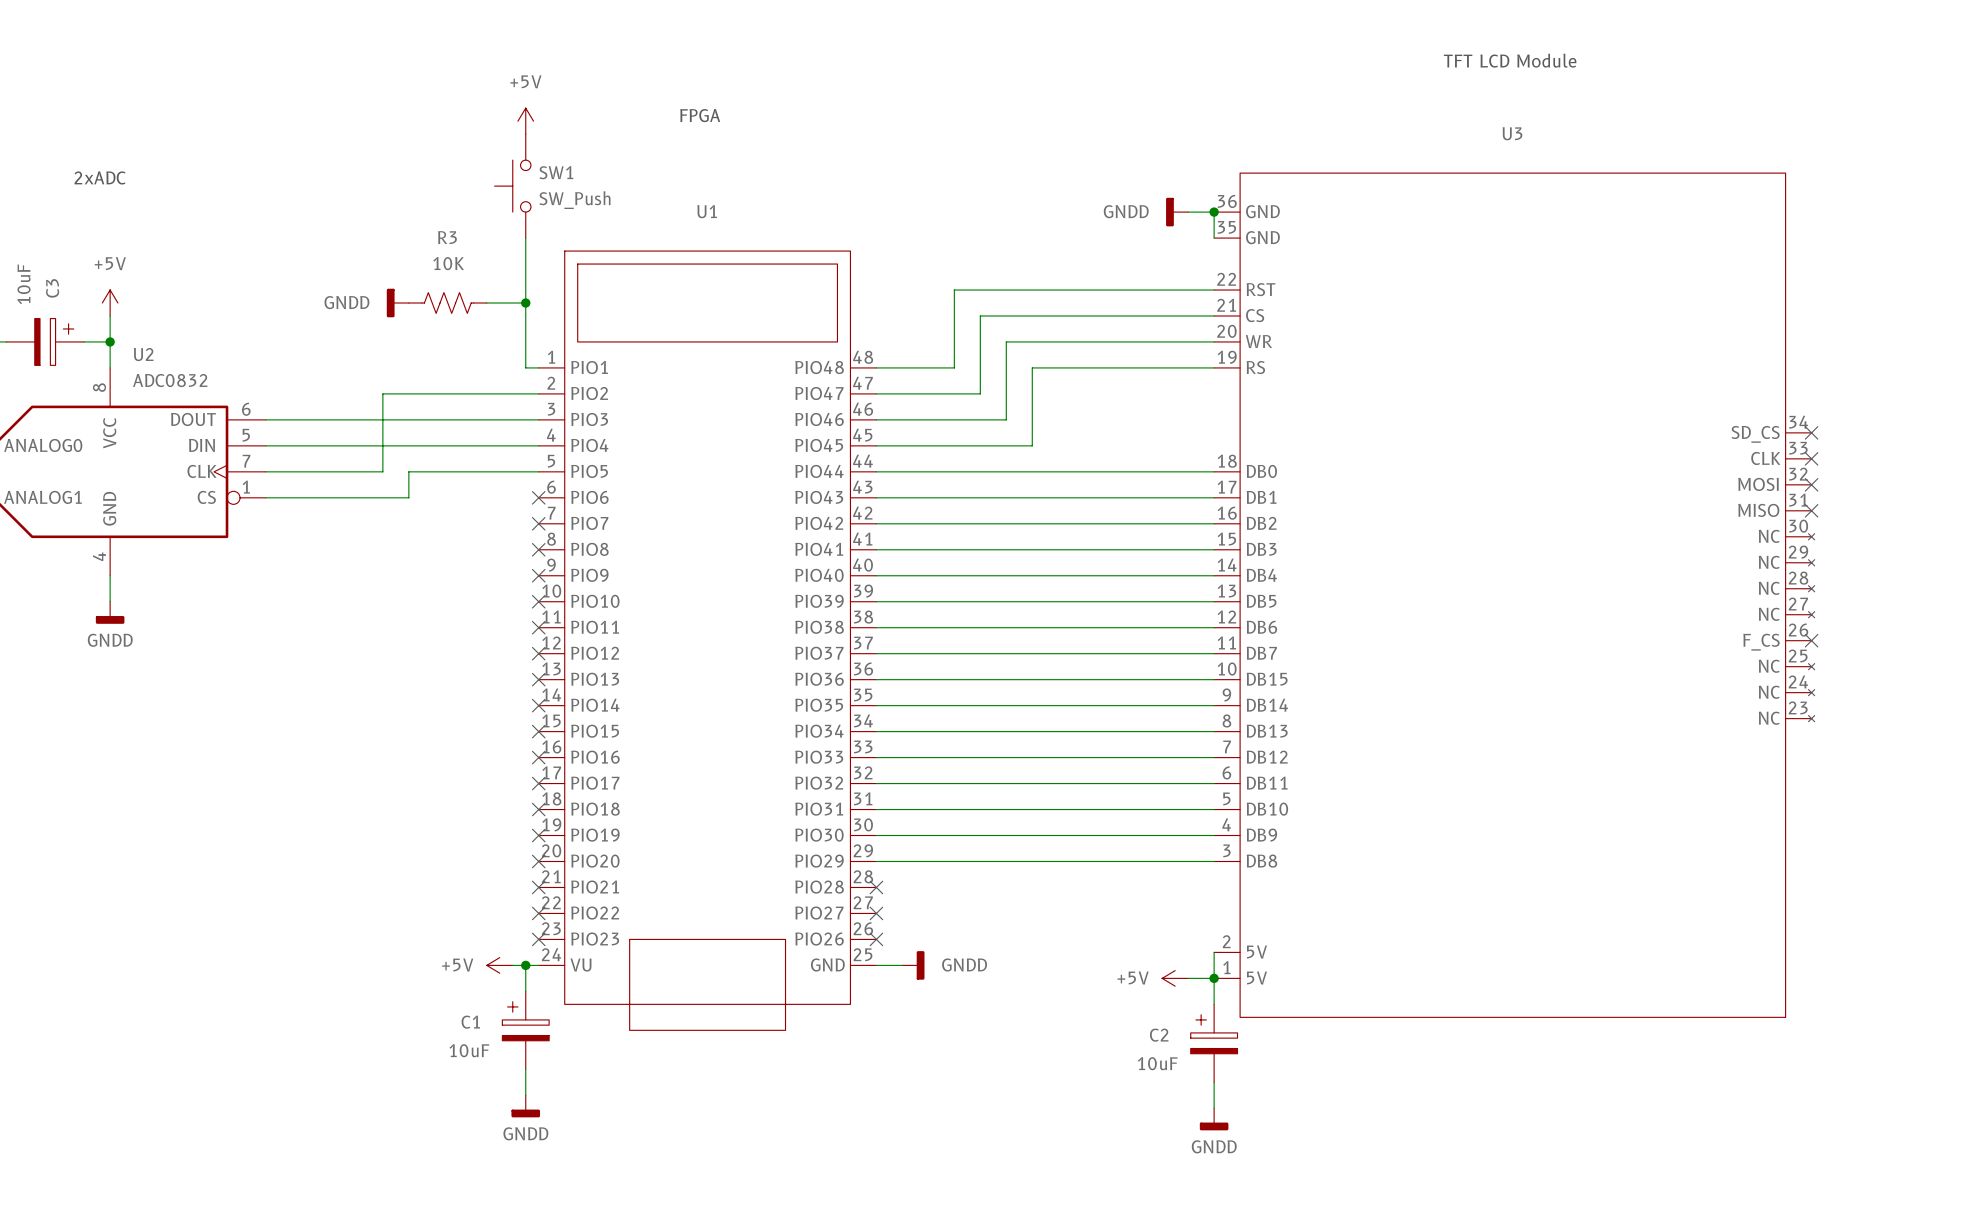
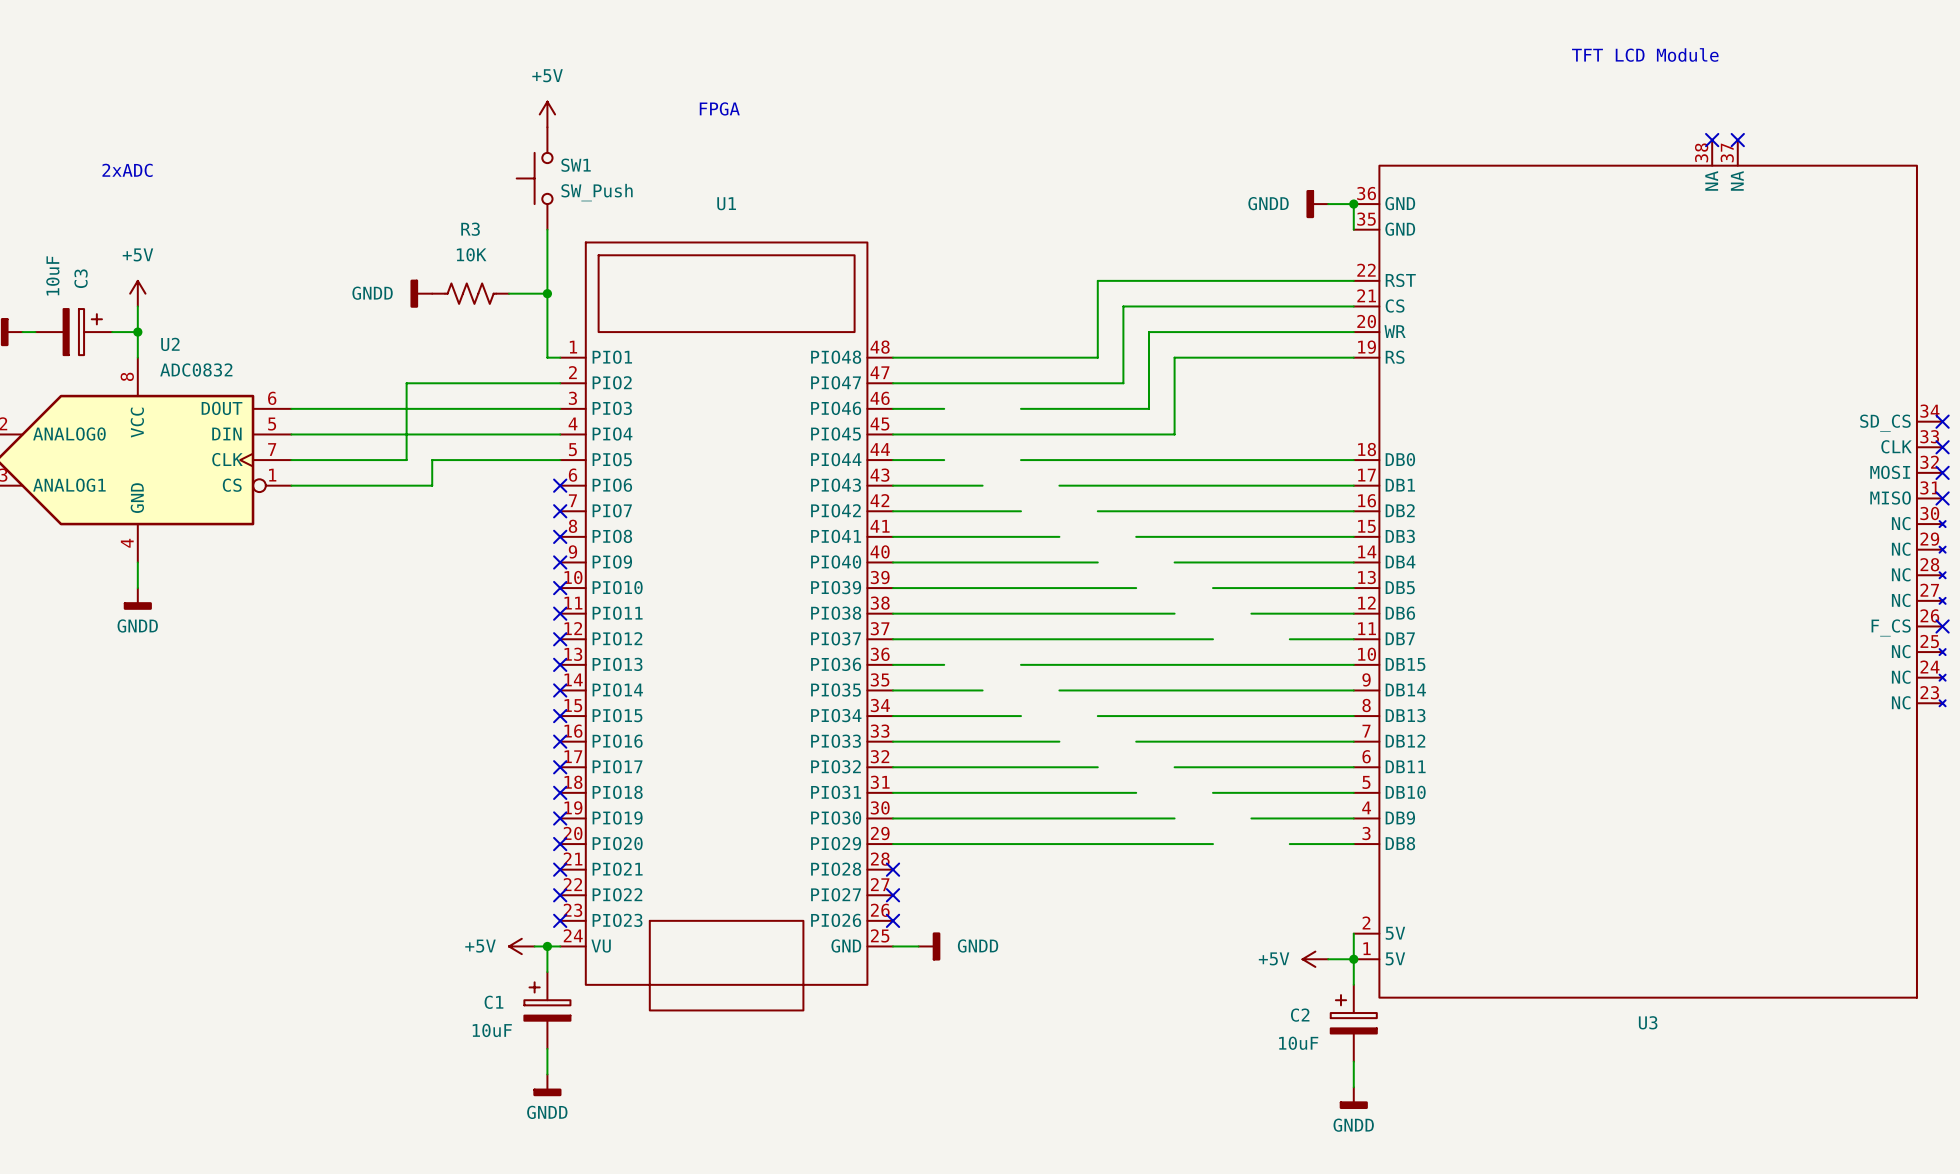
text position: TFT LCD Module (1510, 60) -> TFT LCD Module (1645, 54)
U3 name position: U3 (1512, 133) -> U3 (1648, 1022)
no-connect mark: none -> (1712, 140)
no-connect mark: none -> (1737, 140)
U3 symbol: [1214, 173, 1815, 1018] -> [1353, 140, 1946, 998]
power symbol position: GNDD (1177, 212) -> GNDD (1317, 204)
wire: (1188, 212) (1214, 212) (1214, 238) -> (1328, 204) (1353, 204) (1353, 229)
junction: (1214, 212) -> none
junction: none -> (1353, 204)
wire: (1084, 290) (954, 290) (954, 367) -> (1046, 357) (969, 357)
wire: none -> (1225, 280) (1353, 280)
wire: (1110, 315) (980, 315) (980, 393) -> (1123, 306) (1123, 383) (995, 383)
wire: none -> (1225, 306) (1353, 306)
wire: (1136, 341) (1006, 341) (1006, 419) (928, 419) -> (1148, 332) (1148, 408) (1021, 408)
wire: none -> (1225, 332) (1353, 332)
wire: (1032, 367) (1032, 445) -> (1097, 280) (1097, 357)
wire: (1084, 367) (1162, 367) -> (1046, 434) (1174, 434) (1174, 357)
wire: none -> (1225, 357) (1353, 357)
no-connect mark: (1811, 432) -> none
no-connect mark: none -> (1942, 421)
no-connect mark: (1811, 458) -> none
no-connect mark: none -> (1942, 447)
wire: (928, 471) (1006, 471) -> none
wire: none -> (1225, 460) (1353, 460)
no-connect mark: (1811, 484) -> none
no-connect mark: none -> (1942, 472)
wire: (967, 497) (1045, 497) -> none
wire: none -> (1225, 485) (1353, 485)
no-connect mark: (1811, 510) -> none
no-connect mark: none -> (1942, 498)
wire: (1006, 523) (1084, 523) -> none
wire: none -> (1225, 511) (1353, 511)
wire: (1045, 549) (1123, 549) -> none
wire: none -> (1225, 536) (1353, 536)
wire: (1084, 575) (1162, 575) -> none
wire: none -> (1225, 562) (1353, 562)
wire: (1123, 601) (1201, 601) -> none
wire: none -> (1225, 588) (1353, 588)
wire: (1162, 627) (1214, 627) -> none
wire: none -> (1251, 613) (1353, 613)
no-connect mark: (1811, 640) -> none
no-connect mark: none -> (1942, 626)
wire: (1201, 653) (1214, 653) -> none
wire: none -> (1289, 639) (1353, 639)
wire: (928, 679) (1006, 679) -> none
wire: none -> (1225, 664) (1353, 664)
wire: (967, 705) (1045, 705) -> none
wire: none -> (1225, 690) (1353, 690)
wire: (1006, 731) (1084, 731) -> none
wire: none -> (1225, 716) (1353, 716)
wire: (1045, 757) (1123, 757) -> none
wire: none -> (1225, 741) (1353, 741)
wire: (1084, 783) (1162, 783) -> none
wire: none -> (1225, 767) (1353, 767)
wire: (1123, 809) (1201, 809) -> none
wire: none -> (1225, 792) (1353, 792)
wire: (1162, 835) (1214, 835) -> none
wire: none -> (1251, 818) (1353, 818)
wire: (1201, 861) (1214, 861) -> none
wire: none -> (1289, 844) (1353, 844)
wire: (1214, 952) (1214, 1004) -> (1353, 933) (1353, 984)
power symbol position: +5V (1175, 978) -> +5V (1315, 959)
wire: (1188, 978) (1214, 978) -> (1328, 959) (1353, 959)
junction: (1214, 978) -> none
junction: none -> (1353, 959)
C2 position: (1214, 1043) -> (1353, 1023)
wire: (1214, 1082) (1214, 1108) -> (1353, 1061) (1353, 1087)
power symbol position: GNDD (1214, 1119) -> GNDD (1353, 1098)

